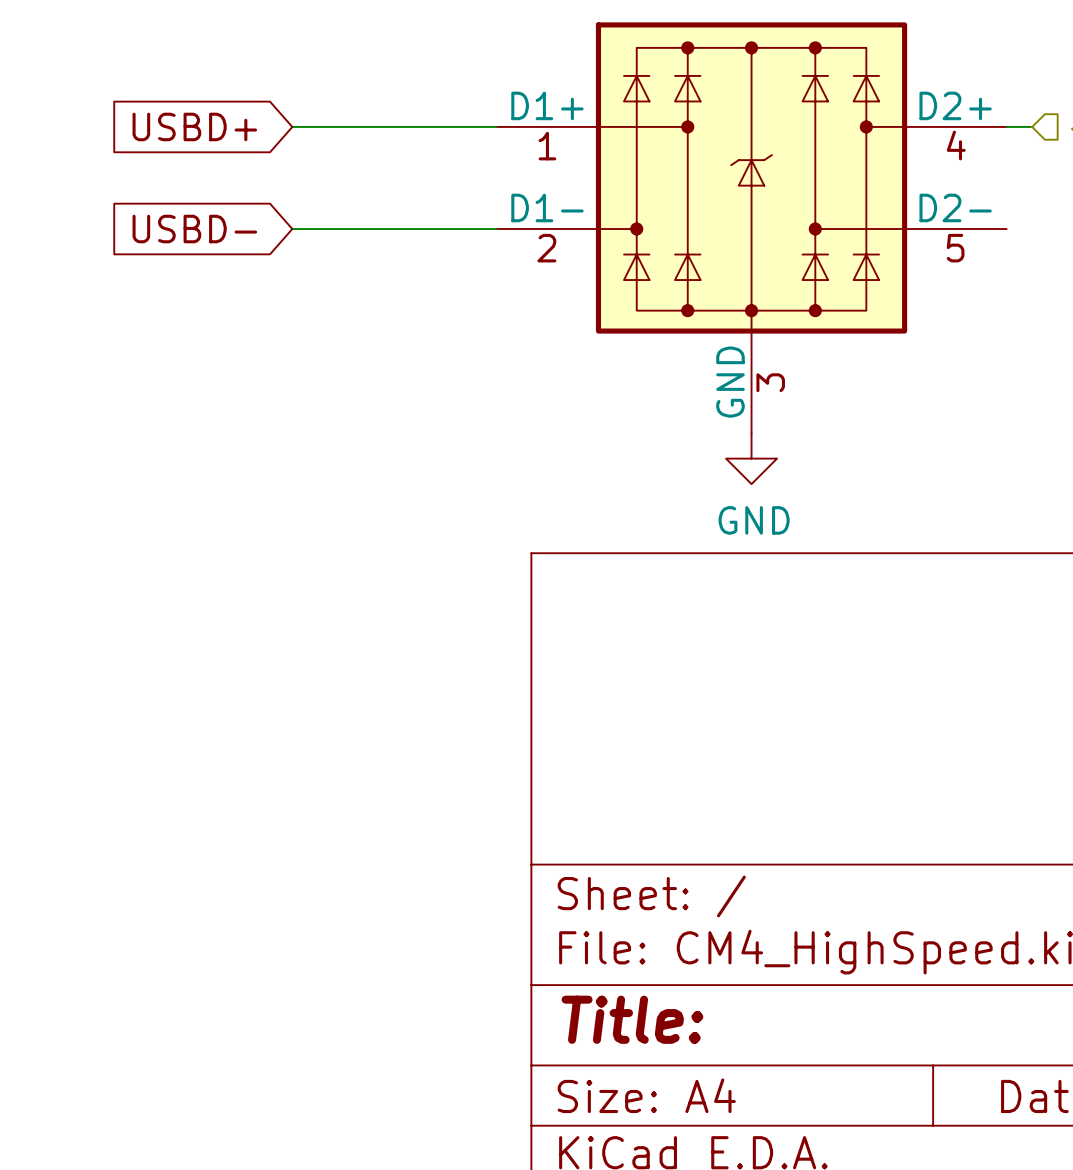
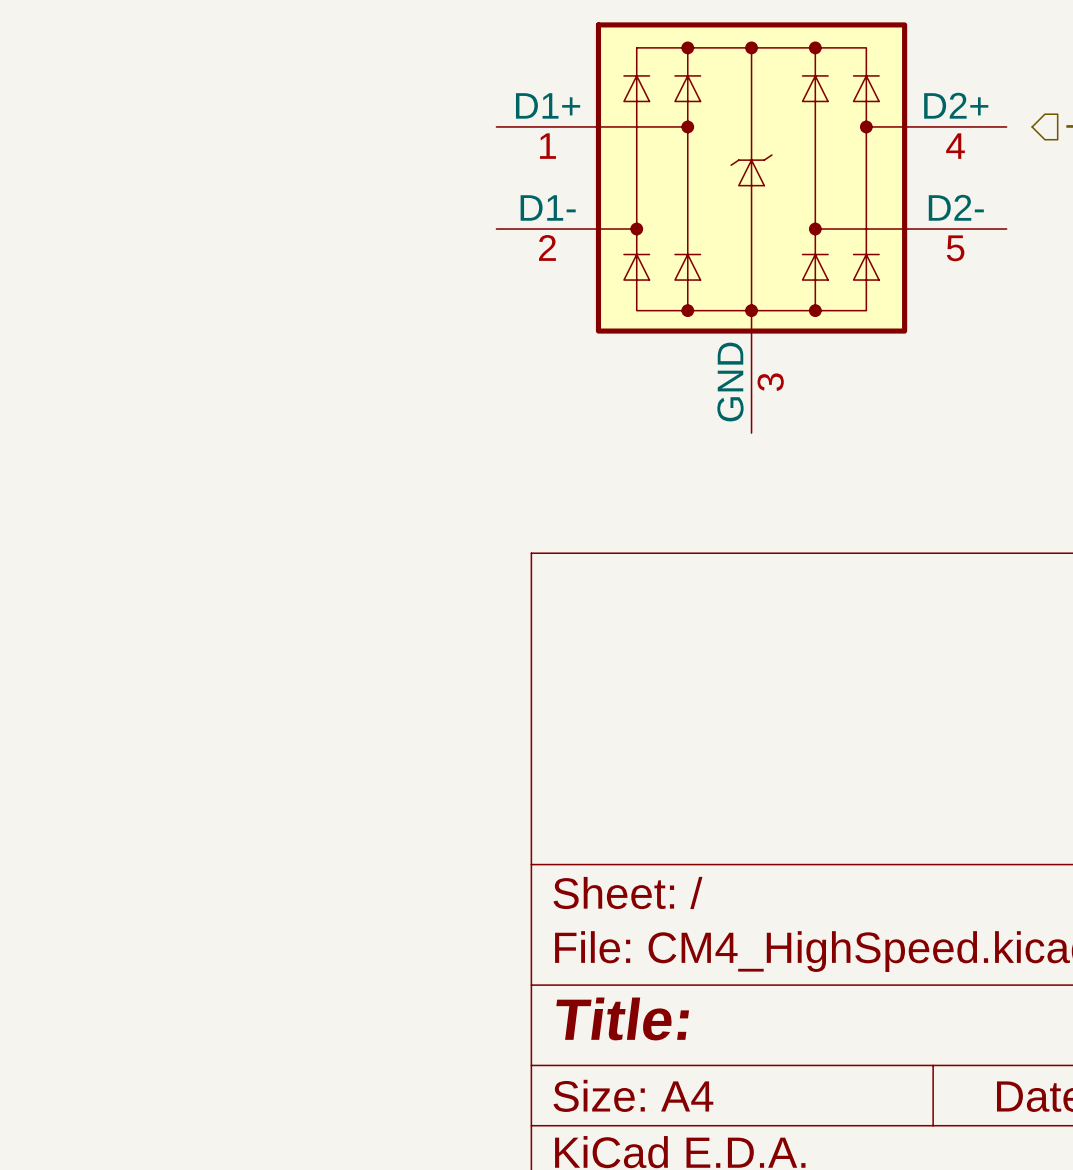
global label: USBD+ (194, 126) -> none
wire: (292, 126) (496, 126) -> none
wire: (1006, 126) (1032, 126) -> none
global label: USBD- (194, 229) -> none
wire: (292, 229) (496, 229) -> none
power symbol: GND (751, 458) -> none

